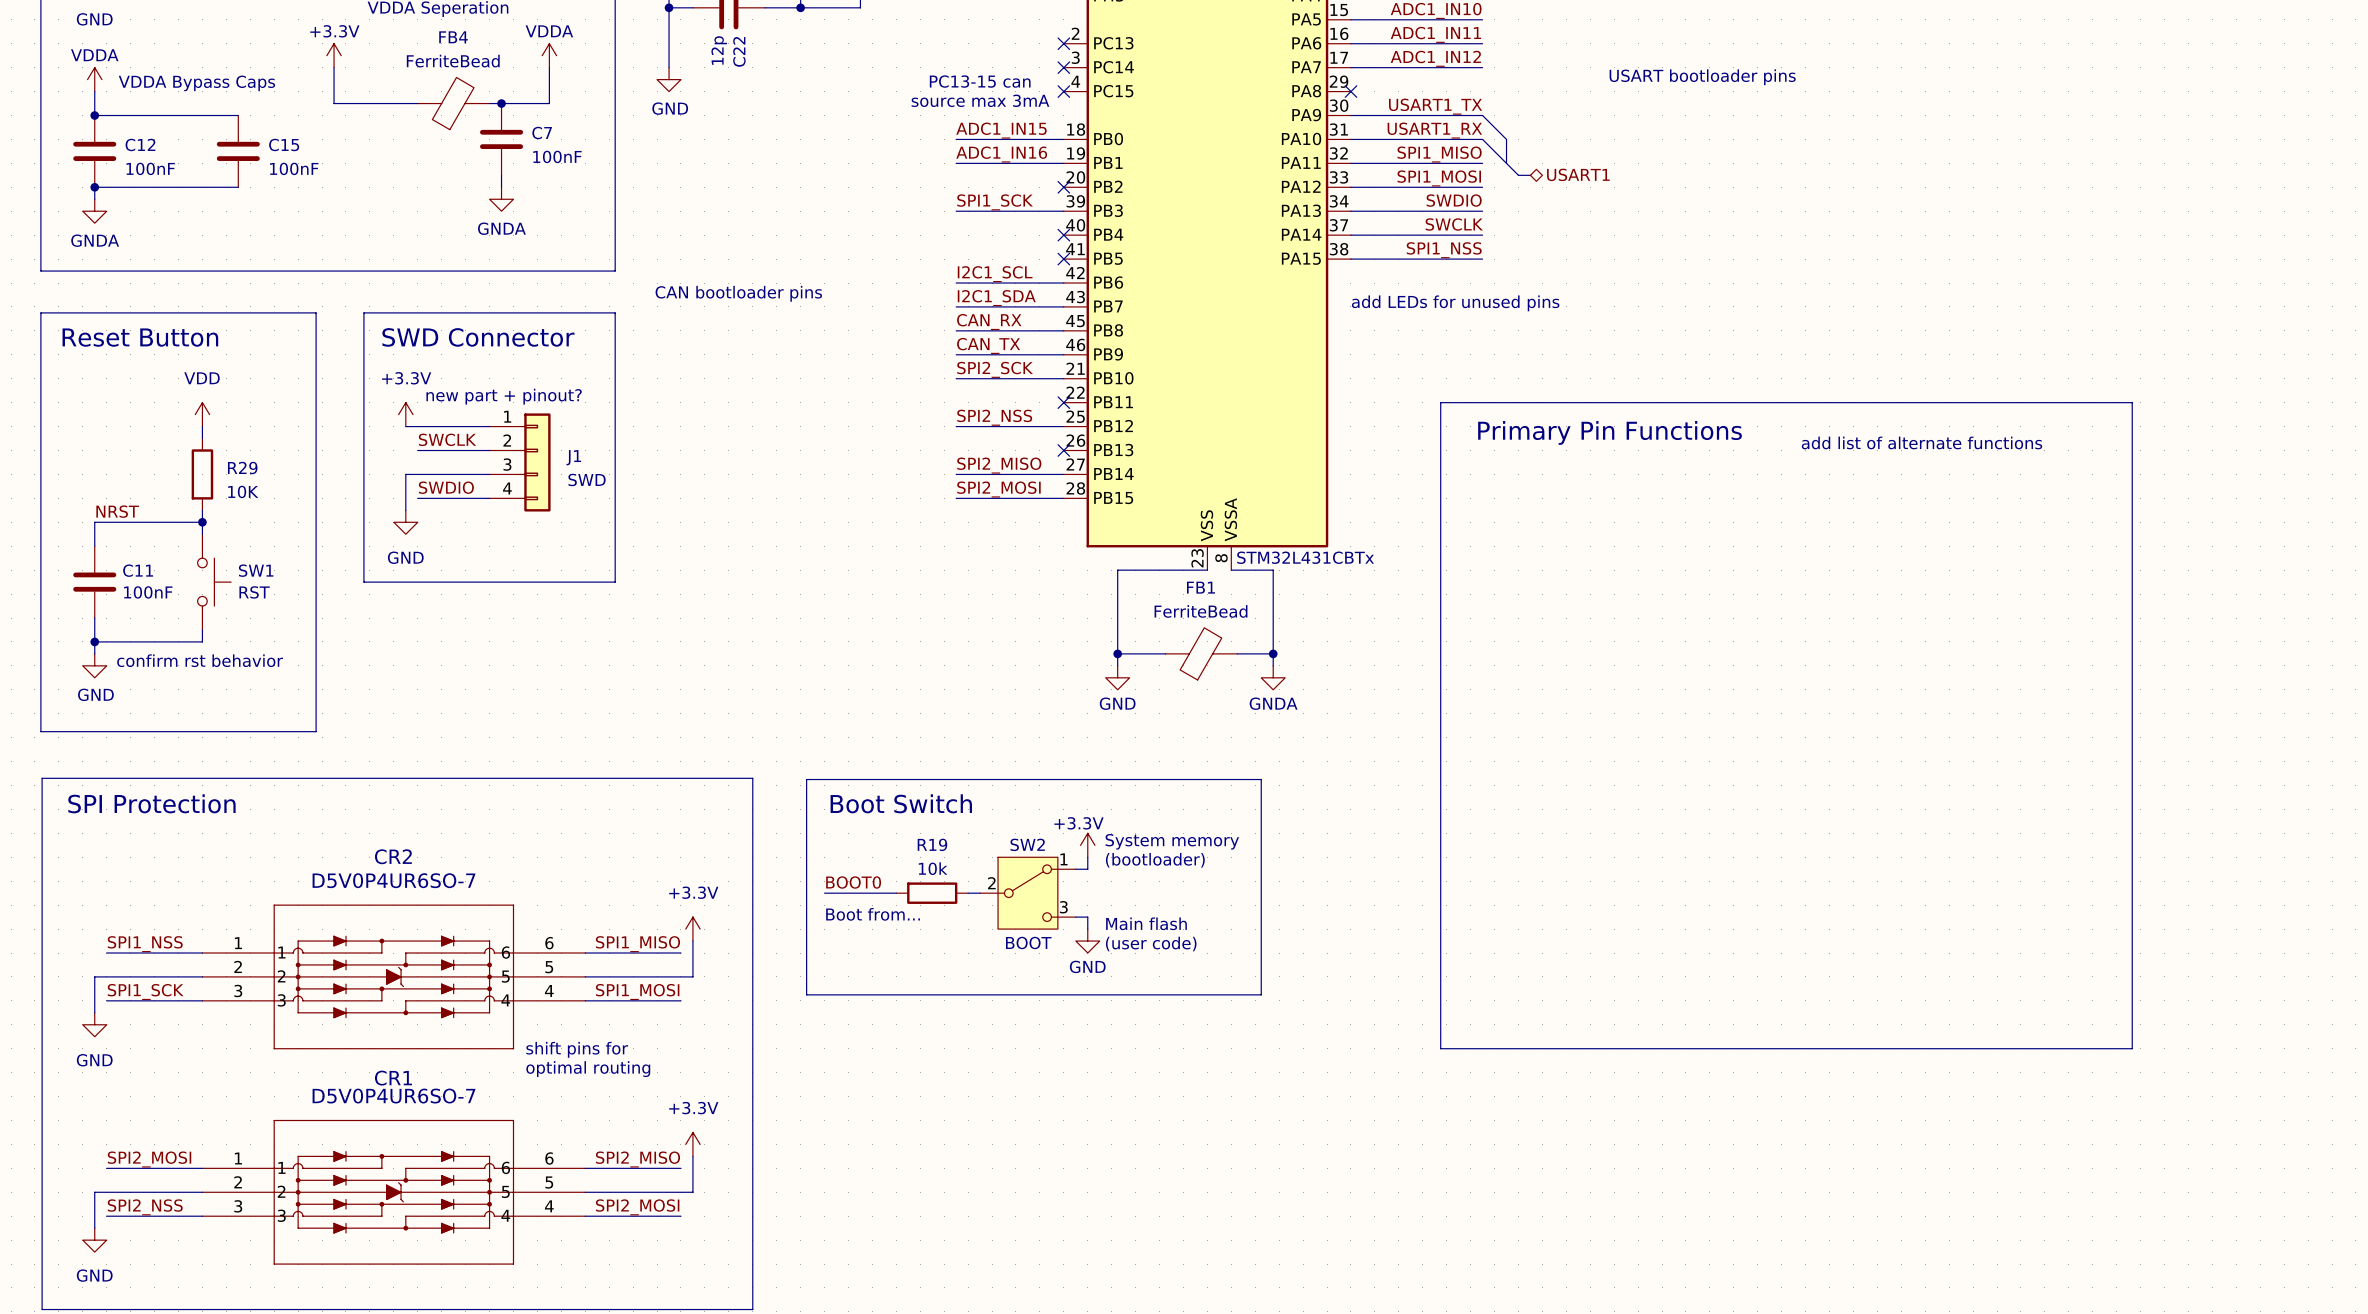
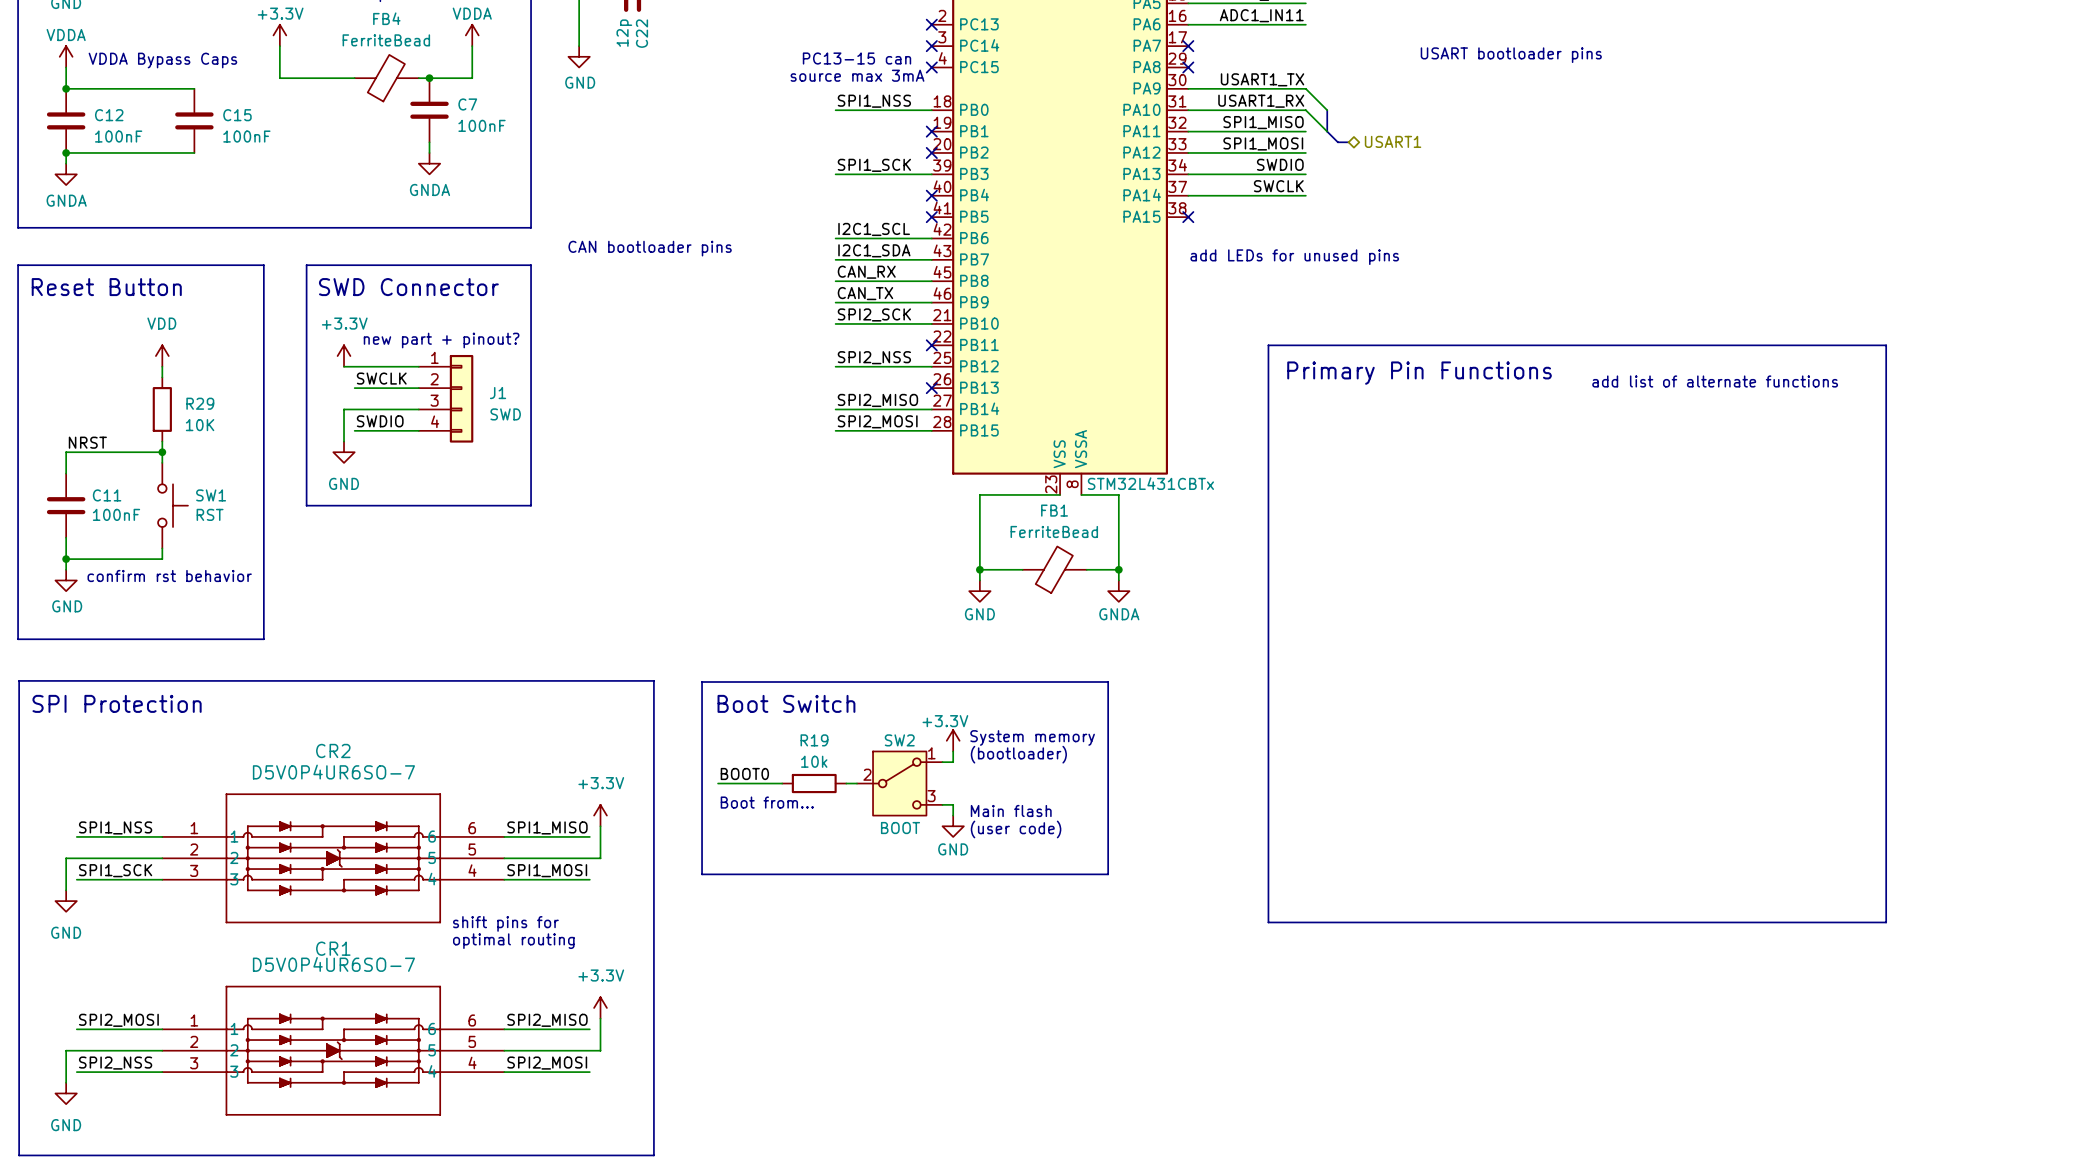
label: ADC1_IN12 (1435, 58) -> none
wire: (1350, 67) (1482, 67) -> none
no-connect mark: none -> (1188, 46)
label: ADC1_IN15 (1001, 130) -> SPI1_NSS (874, 101)
label: ADC1_IN16 (1001, 154) -> none
wire: (956, 163) (1063, 163) -> none
no-connect mark: none -> (931, 131)
label: SPI1_NSS (1444, 250) -> none
wire: (1350, 259) (1482, 259) -> none
no-connect mark: none -> (1188, 217)

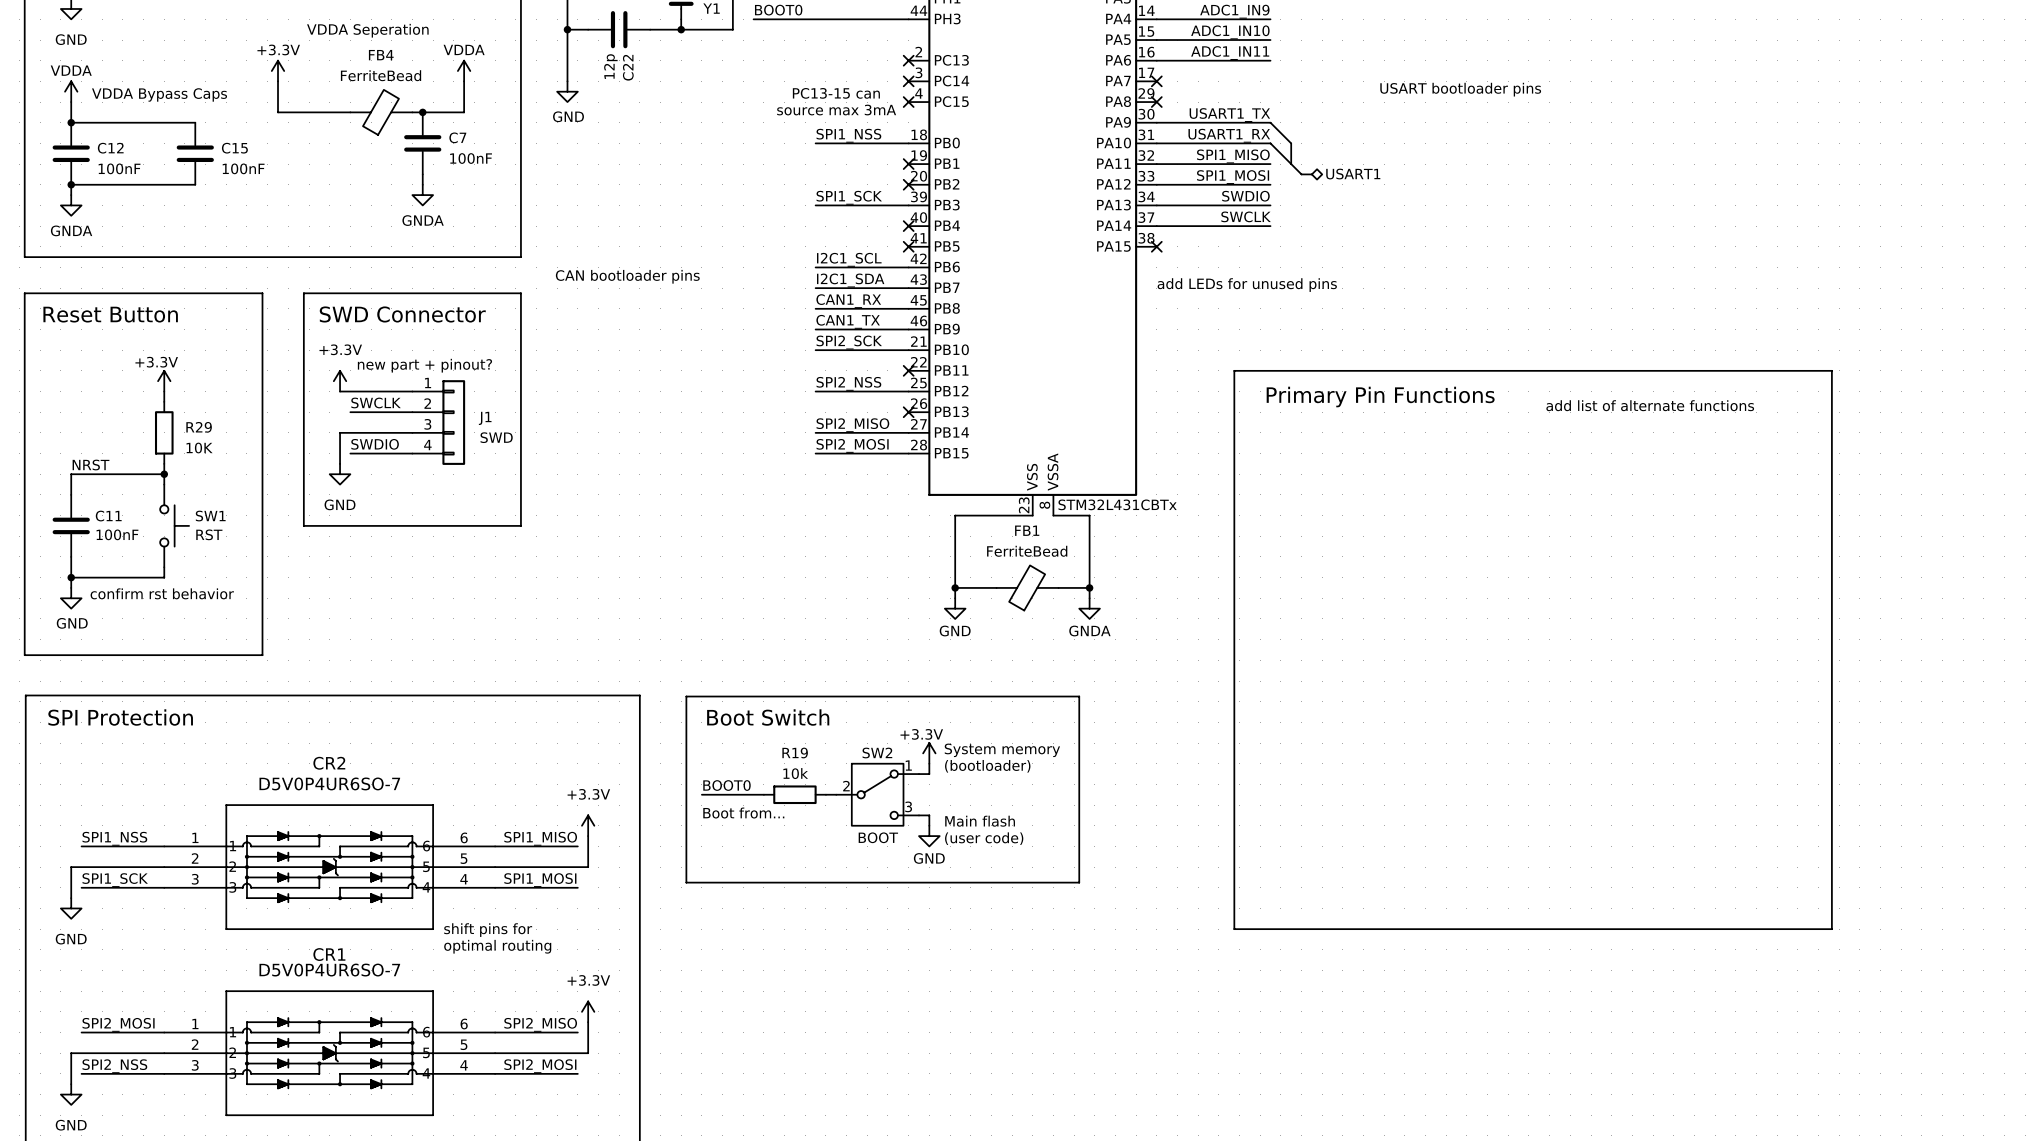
label: CAN_RX (866, 272) -> CAN1_RX (848, 301)
label: CAN_TX (865, 293) -> CAN1_TX (848, 321)
power symbol: VDD (162, 356) -> +3.3V (164, 381)

